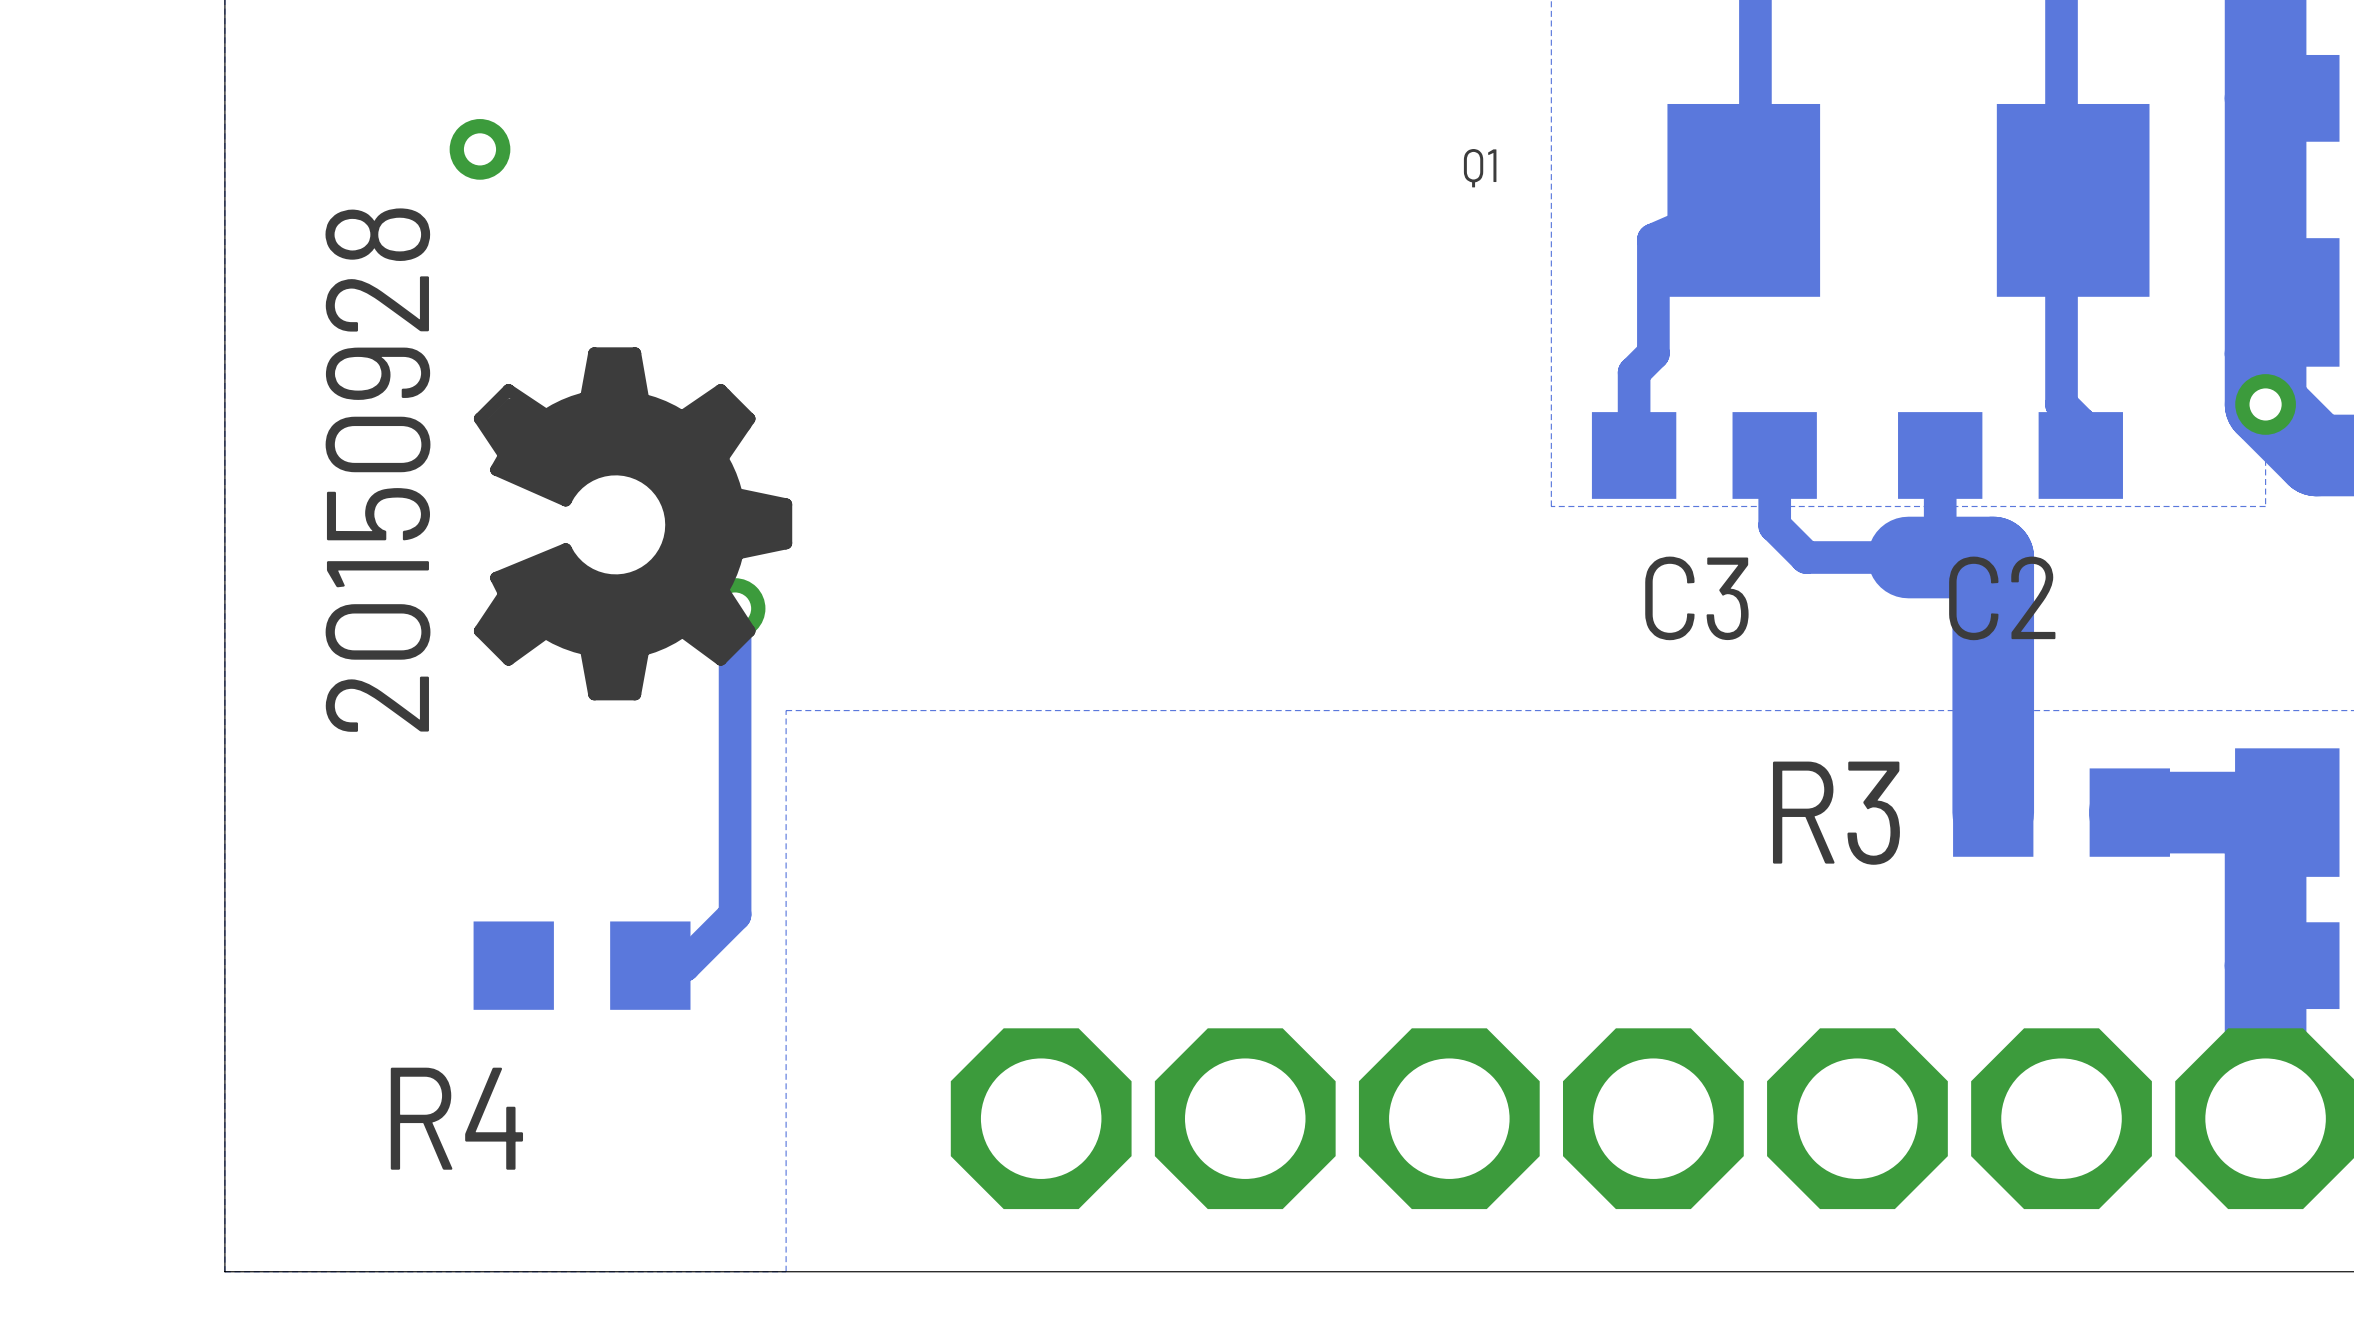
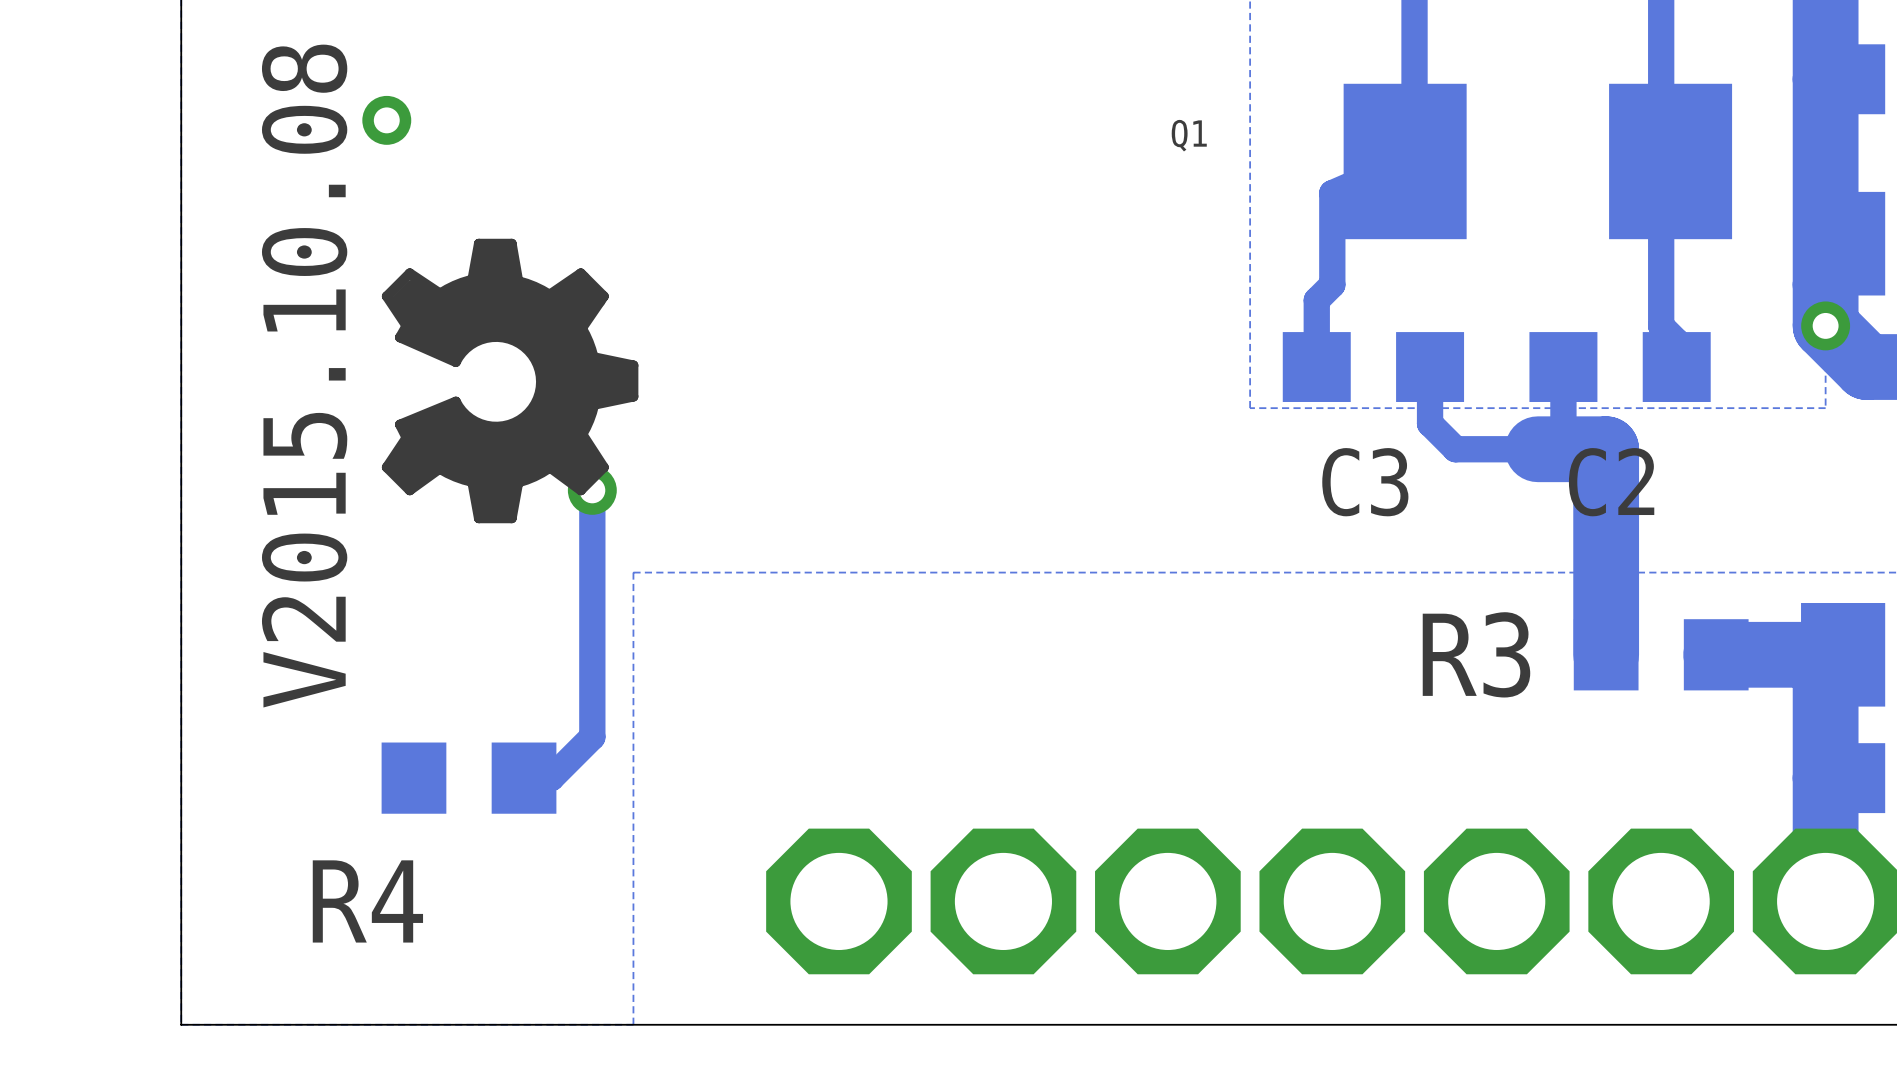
text: 20150928 (377, 470) -> V2015.10.08 (304, 376)
drawing position: (633, 523) -> (510, 381)

